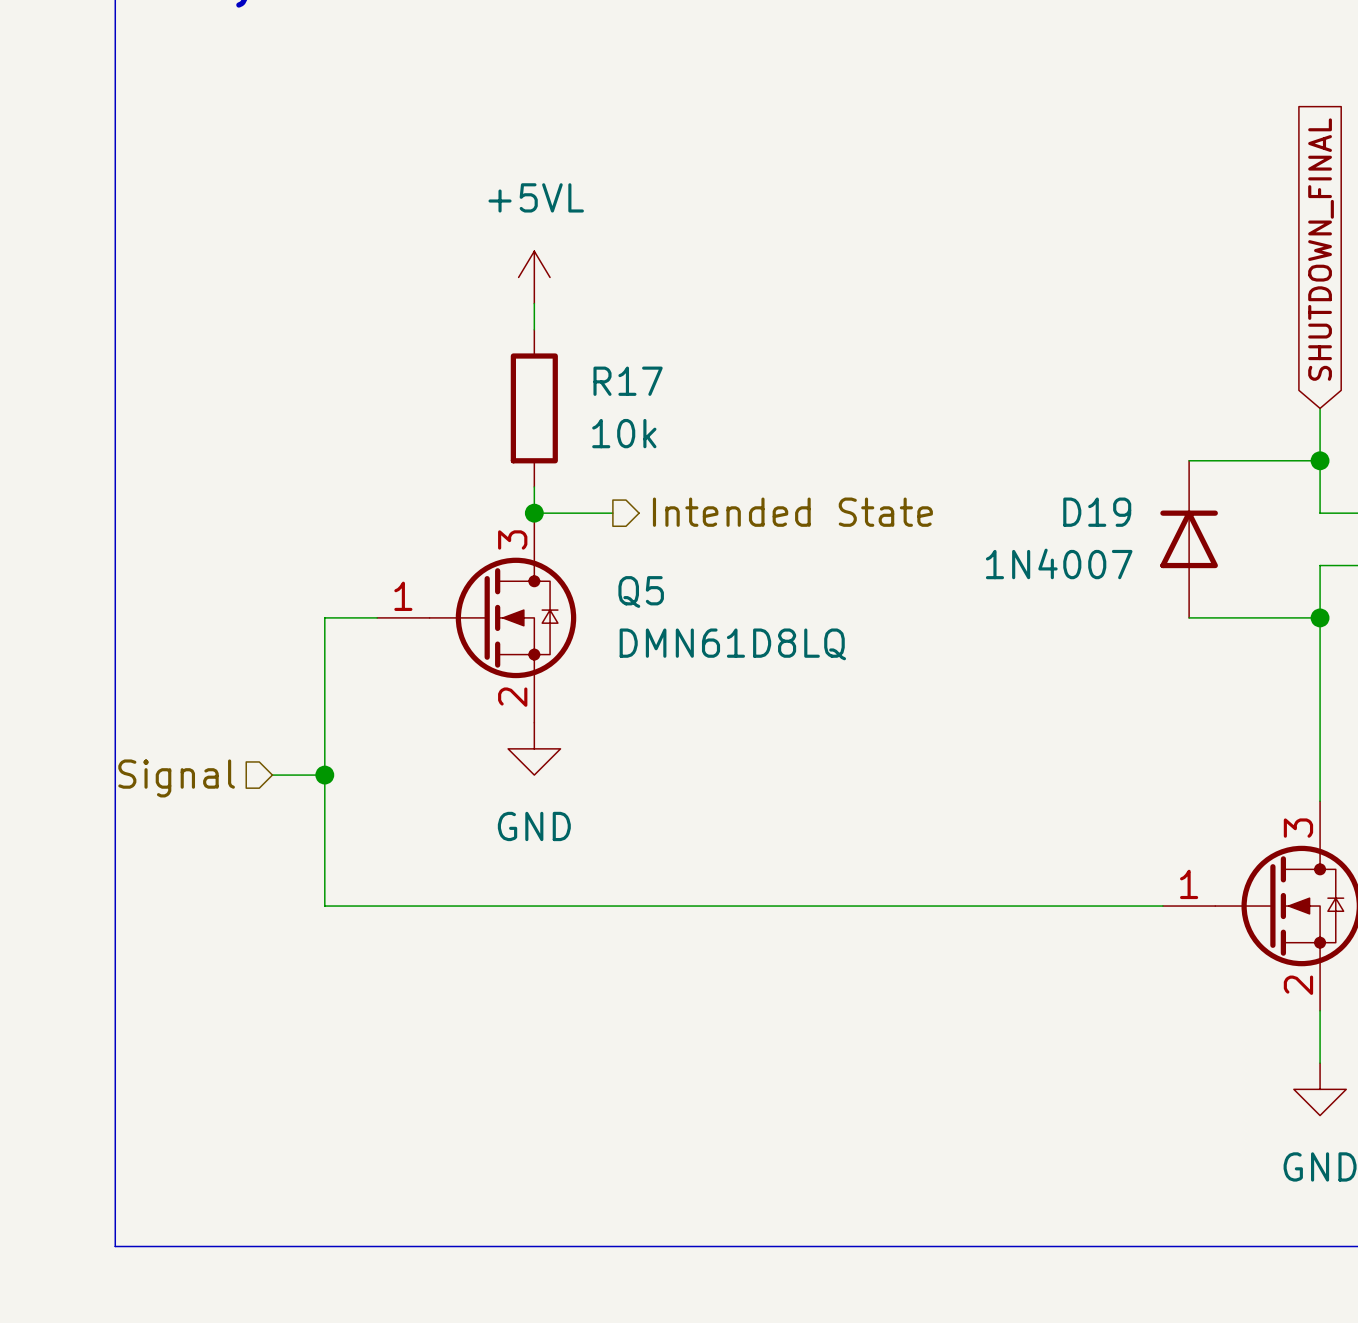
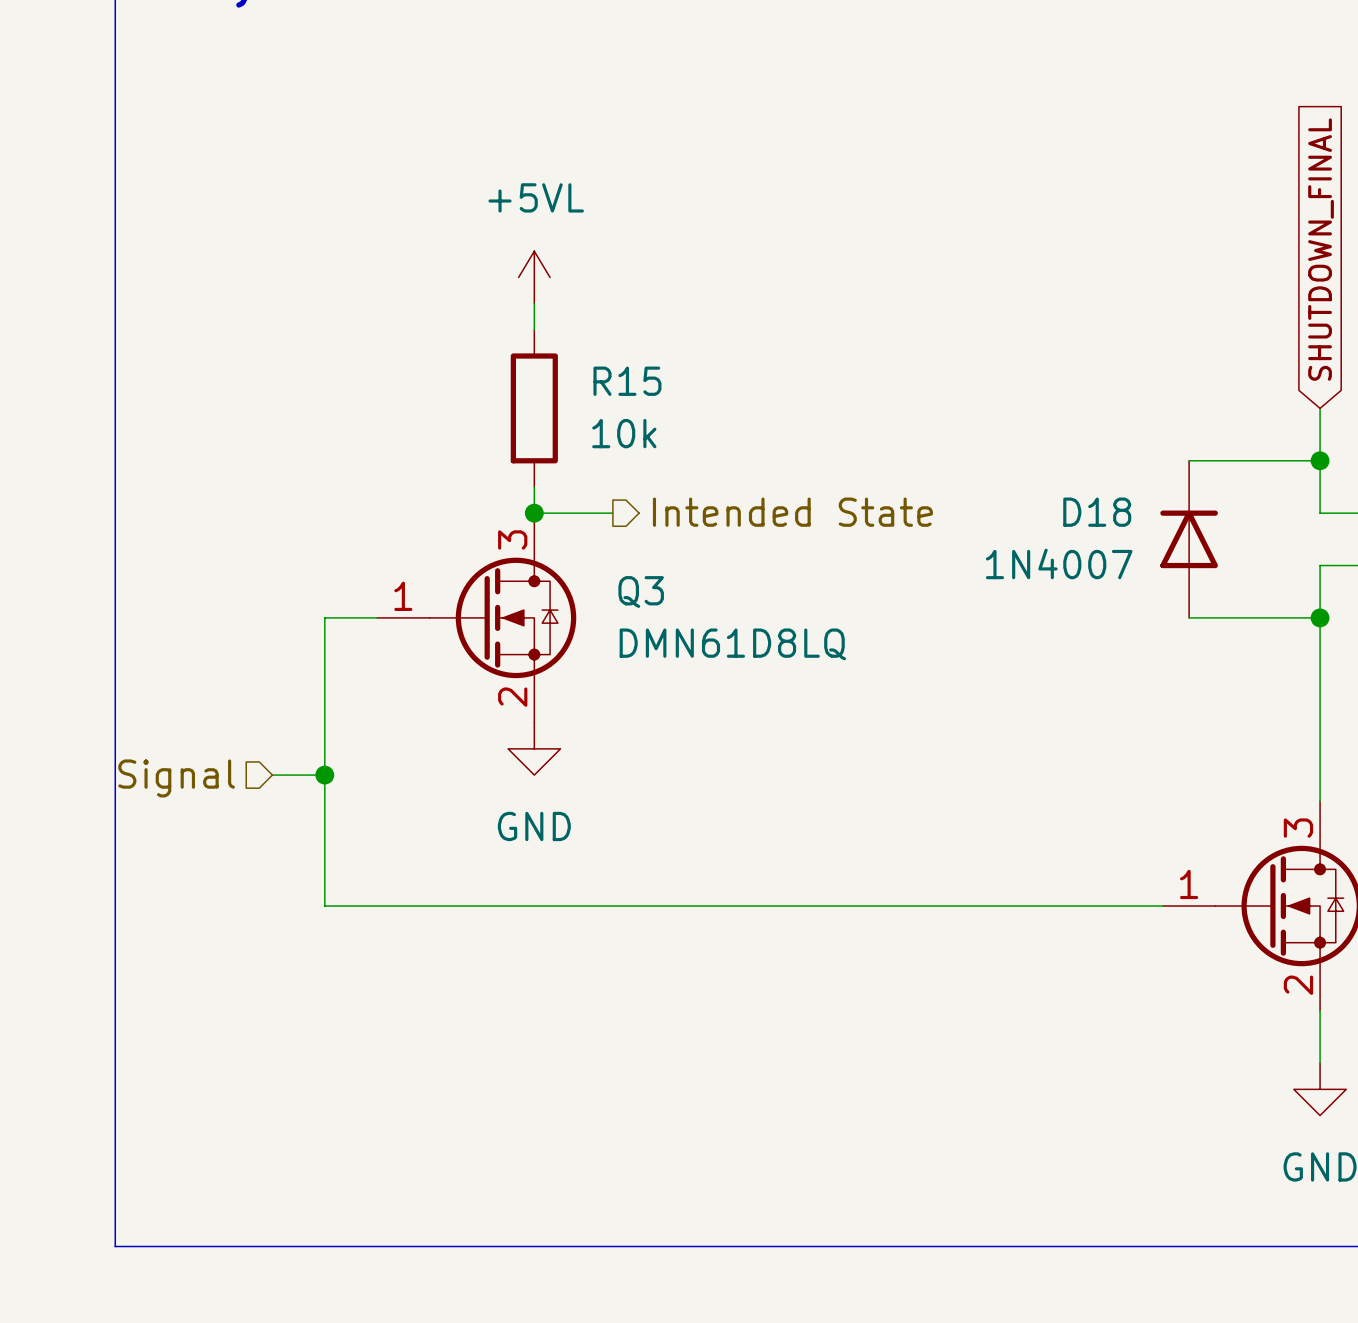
R17 name: R17 (628, 381) -> R15 (627, 381)
D19 name: D19 (1097, 512) -> D18 (1097, 512)
Q5 name: Q5 (641, 592) -> Q3 (641, 592)

